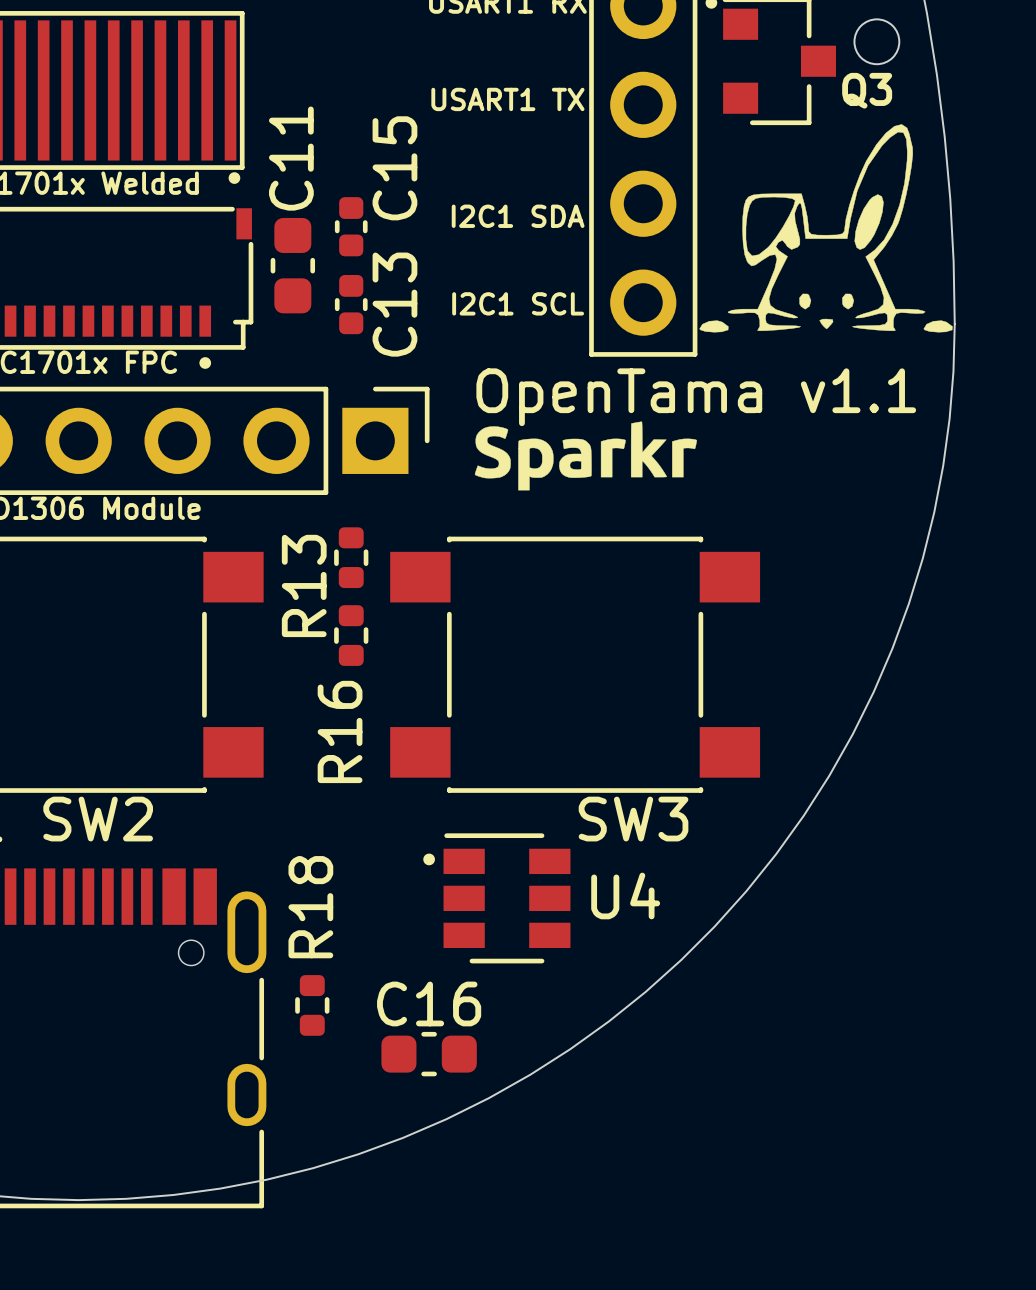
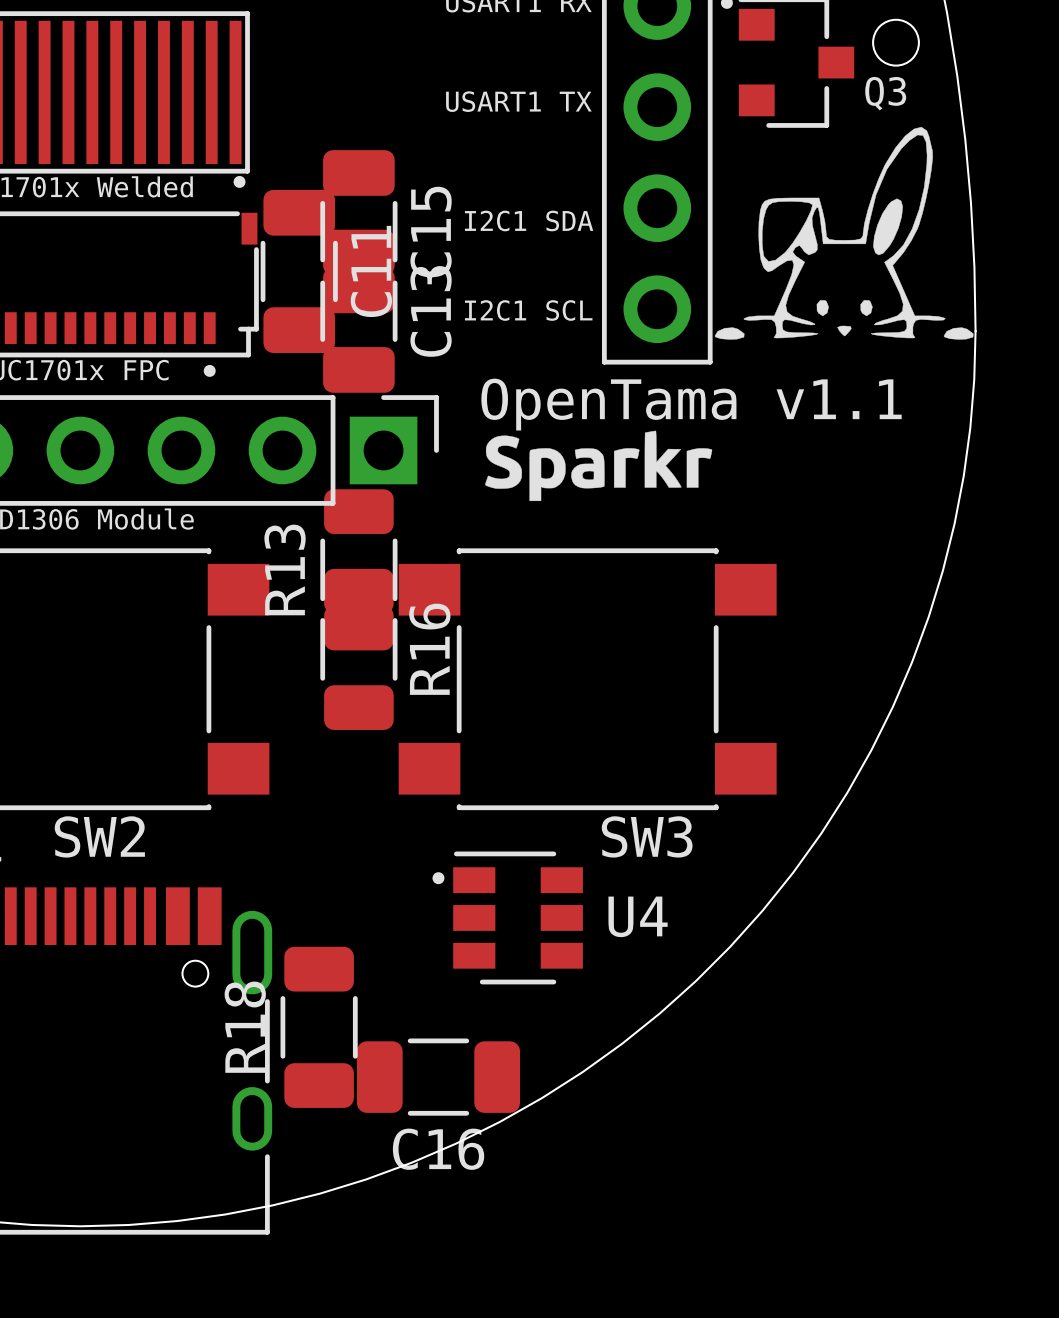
C11 name position: C11 (291, 158) -> C11 (371, 271)
C15 footprint: [334, 197, 368, 257] -> [320, 150, 398, 314]
C11 footprint: [270, 217, 316, 314] -> [260, 189, 338, 354]
C13 footprint: [334, 275, 368, 335] -> [320, 229, 398, 393]
R13 footprint: [334, 527, 369, 589] -> [320, 489, 398, 651]
R16 footprint: [334, 605, 369, 666] -> [320, 568, 398, 730]
R16 name position: R16 (340, 731) -> R16 (429, 649)
R18 name position: R18 (310, 907) -> R18 (245, 1027)
R18 footprint: [295, 975, 330, 1036] -> [280, 946, 358, 1108]
C16 name position: C16 (429, 1003) -> C16 (438, 1149)
C16 footprint: [381, 1031, 477, 1077] -> [356, 1038, 521, 1116]

